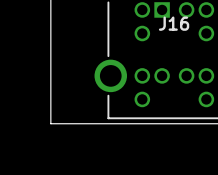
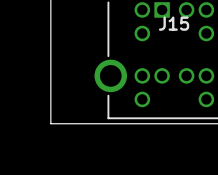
J16 name: J16 (174, 23) -> J15 (174, 23)

